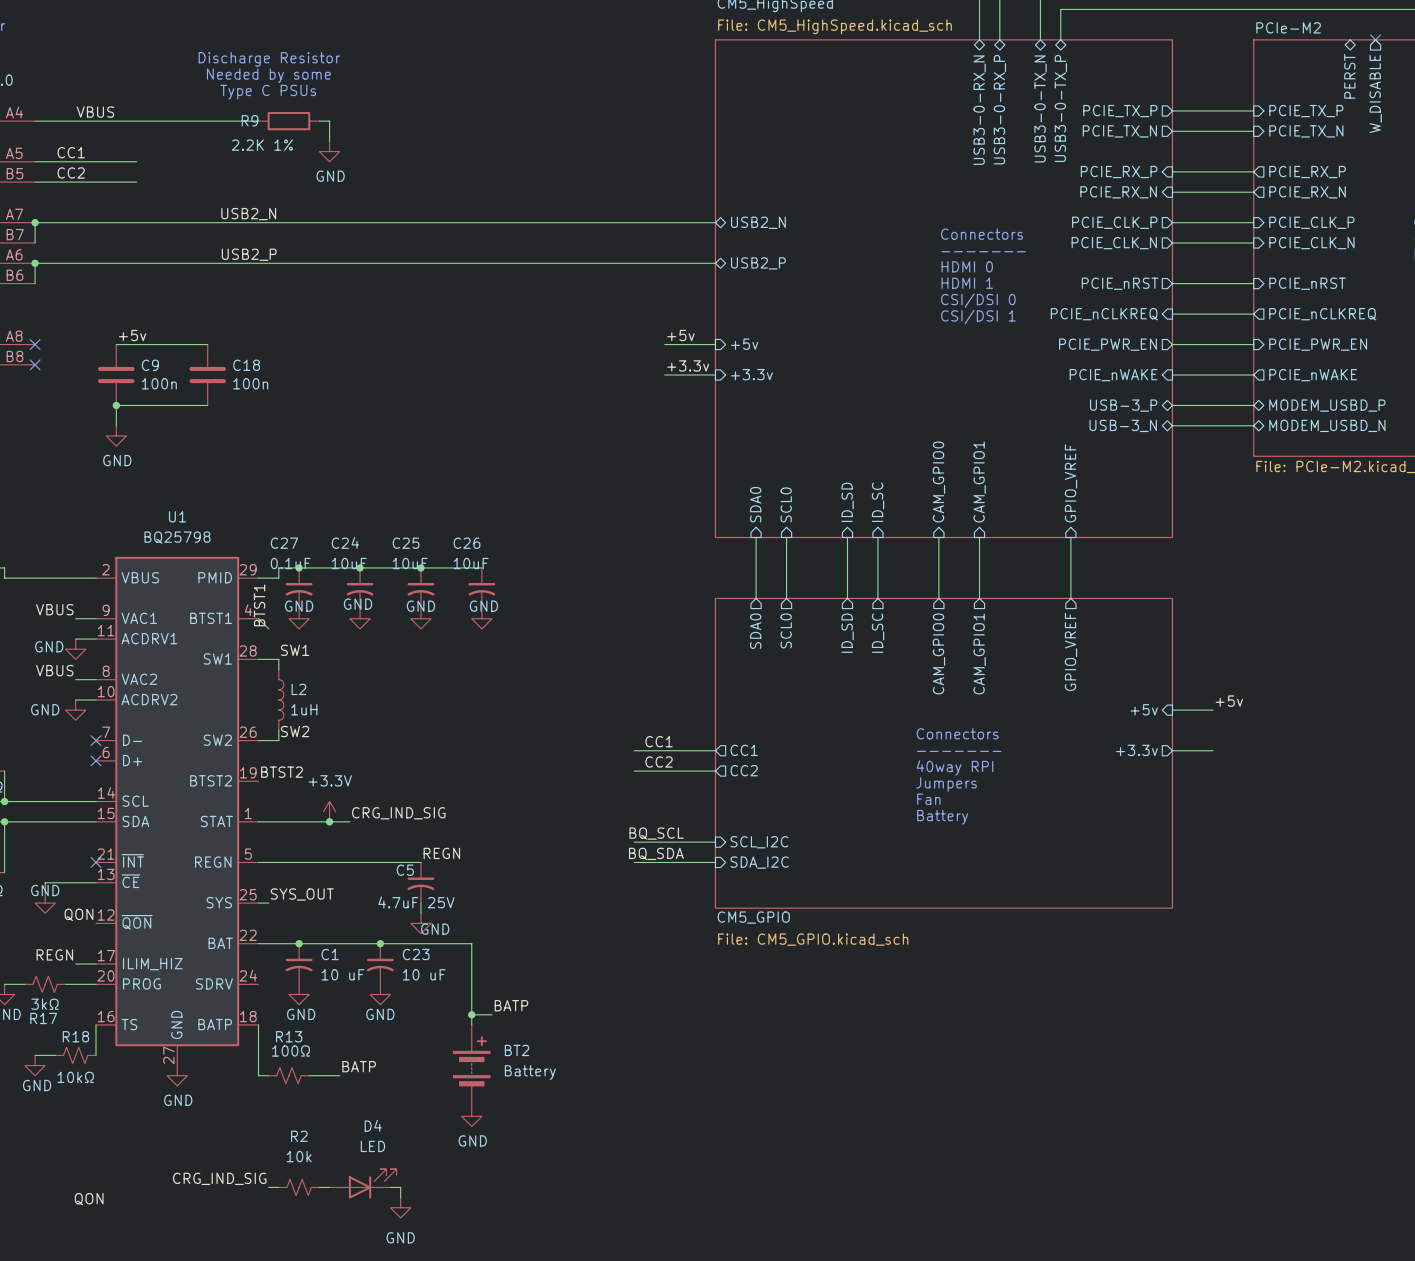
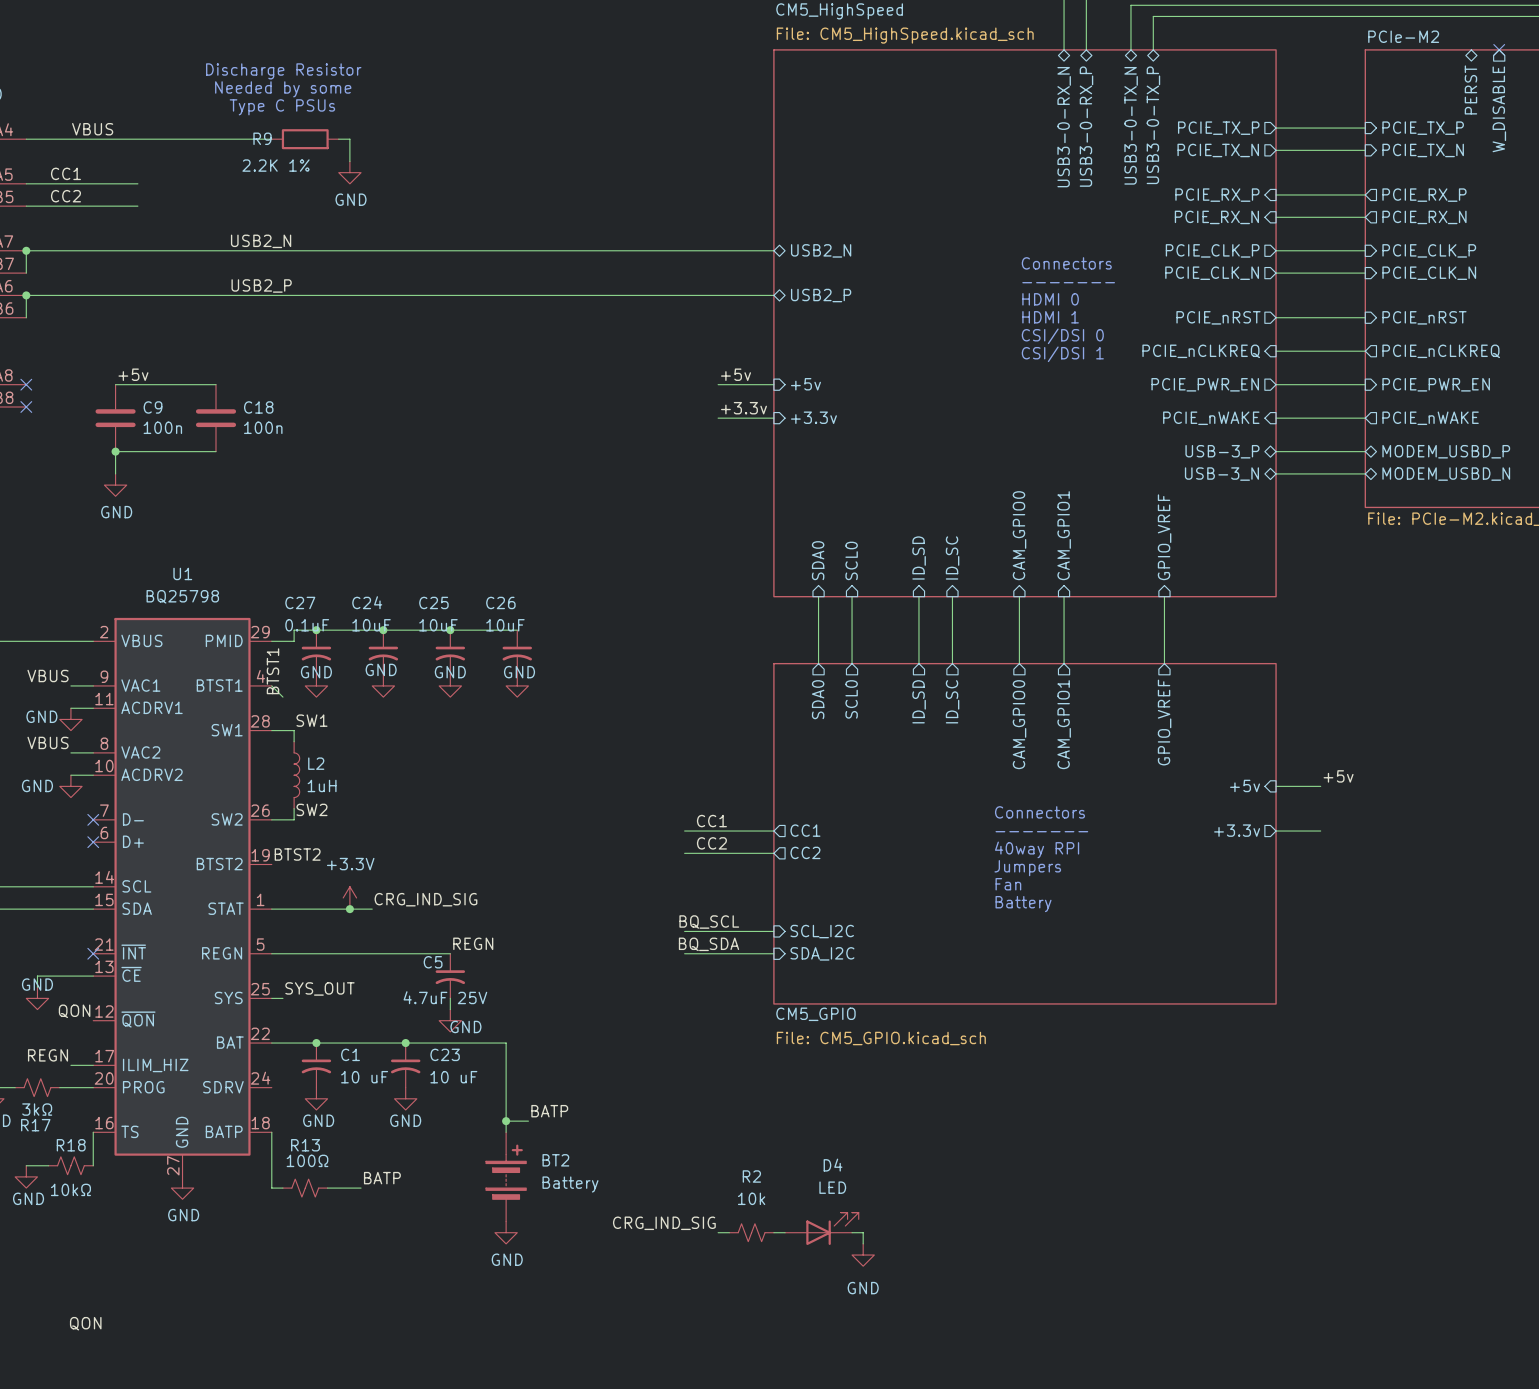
label: none -> CRG_IND_SIG (664, 1223)
wire: none -> (718, 1232) (729, 1232)
wire: none -> (773, 1232) (785, 1232)
wire: none -> (852, 1232) (863, 1232) (863, 1243)
power symbol: none -> GND (863, 1255)
label: CRG_IND_SIG (219, 1178) -> none
D4 position: (363, 1183) -> (821, 1228)
wire: (268, 1187) (278, 1187) -> none
R2 position: (299, 1187) -> (751, 1232)
wire: (319, 1187) (329, 1187) -> none
wire: (390, 1187) (400, 1187) (400, 1197) -> none
power symbol: GND (400, 1207) -> none

